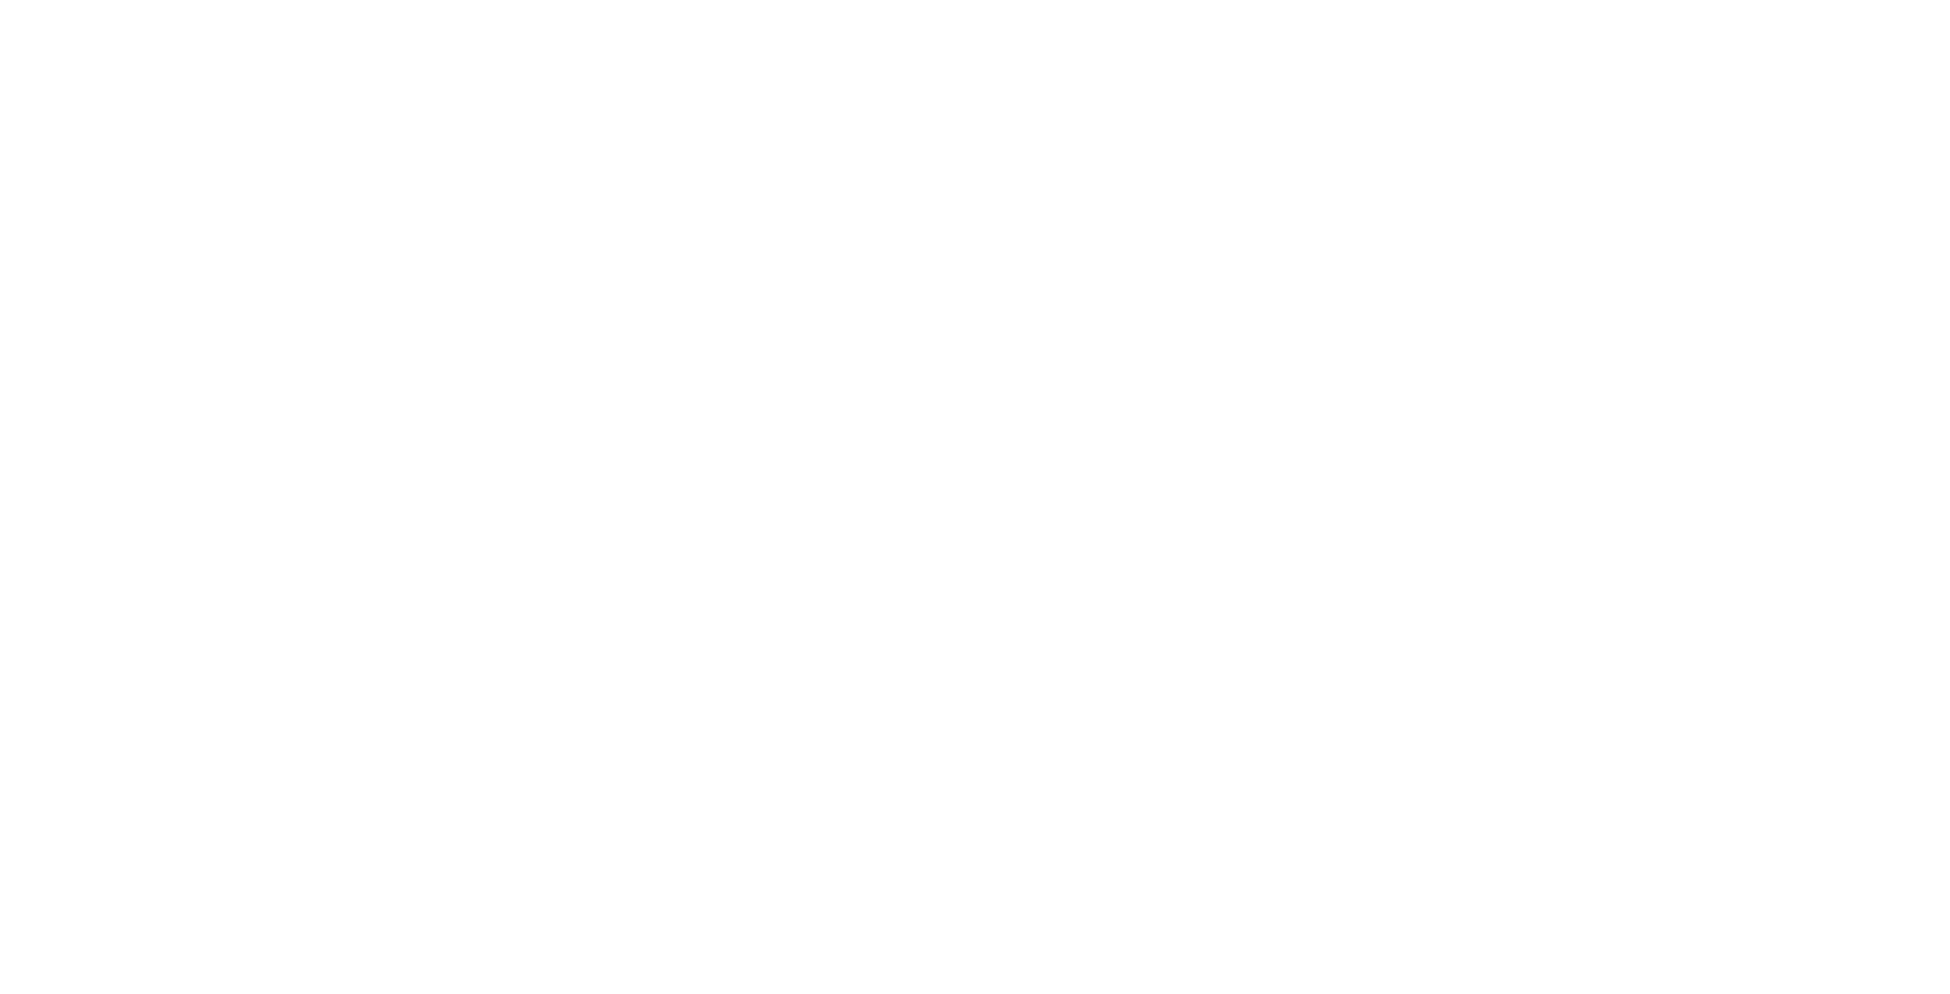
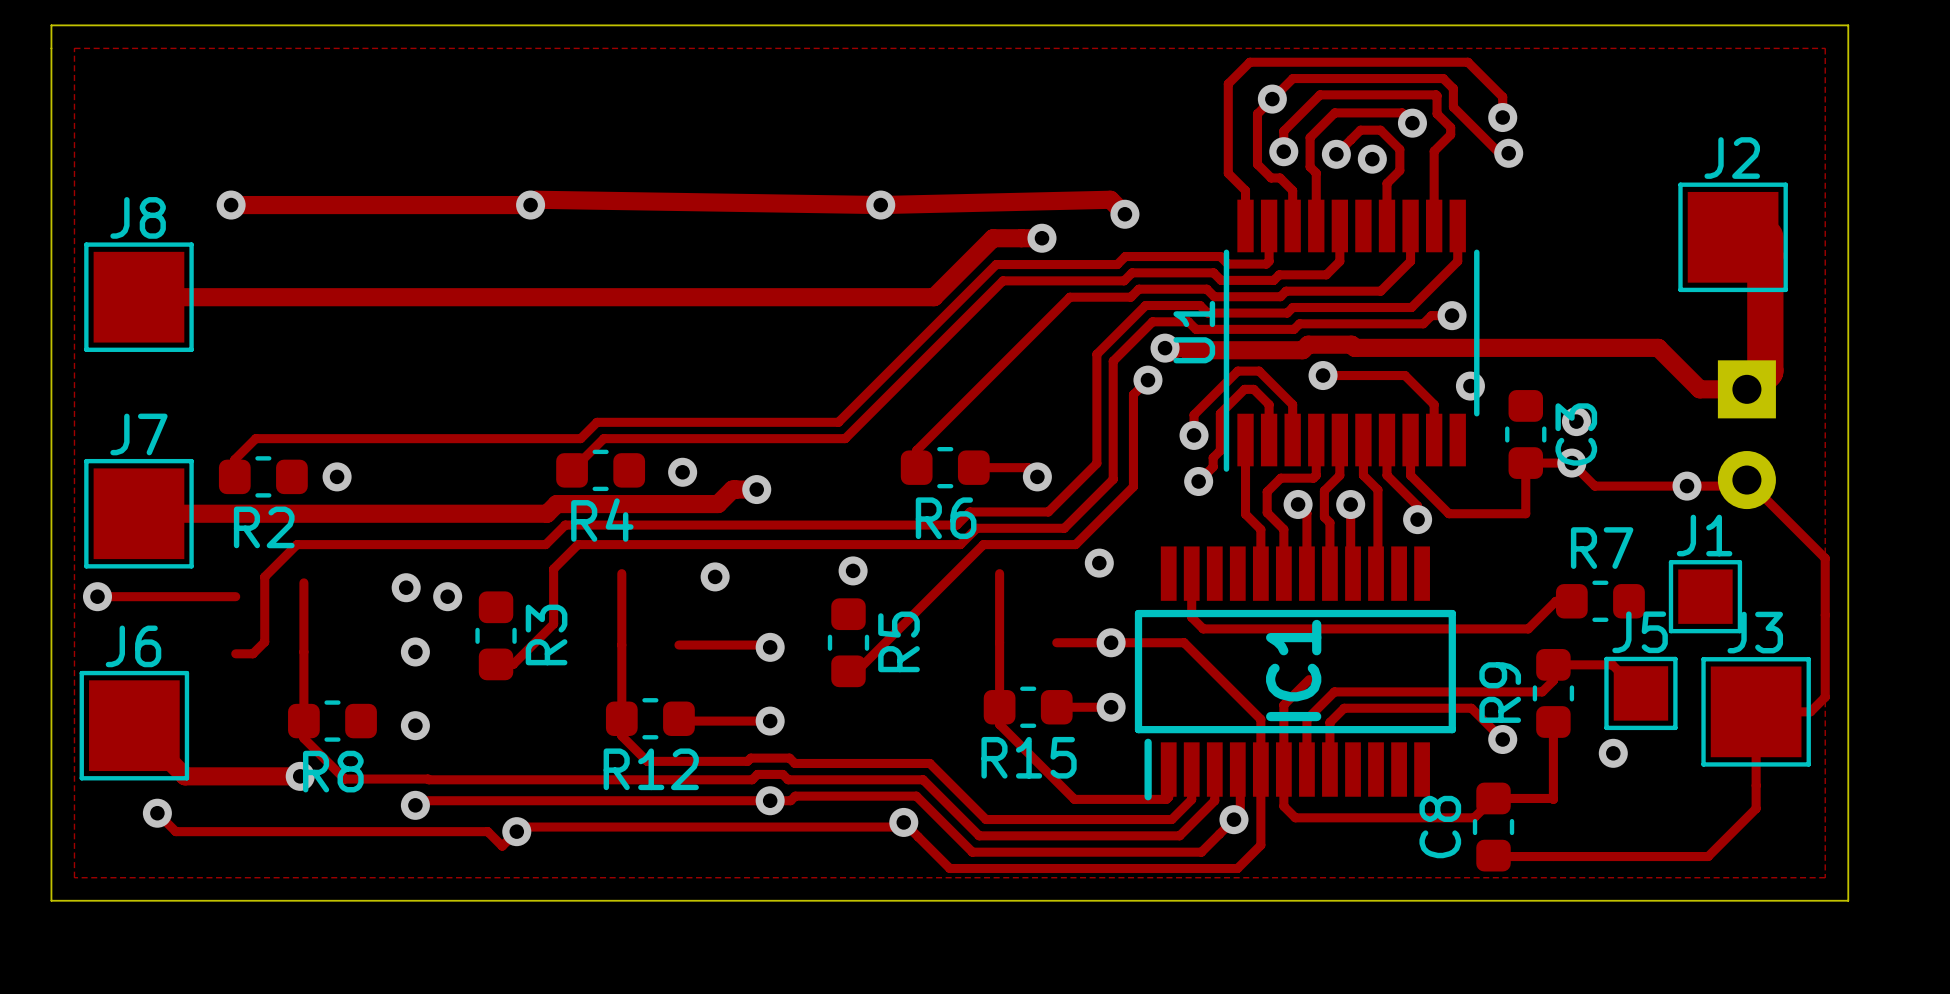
board edge: none -> (51, 25) (1848, 25) (1848, 900) (51, 900) (51, 25)
zone outline: none -> (74, 48) (74, 877) (1825, 877) (1825, 48) (74, 48)
via: none -> (1272, 99)
track: none -> (1502, 117) (1502, 96) (1467, 62) (1249, 62) (1228, 83) (1228, 173) (1245, 190) (1245, 225)
via: none -> (1502, 117)
track: none -> (1412, 123) (1402, 112) (1334, 112) (1310, 137) (1310, 166) (1316, 173) (1316, 225)
via: none -> (1412, 123)
track: none -> (1283, 151) (1283, 131) (1320, 94) (1436, 94) (1437, 113) (1450, 127) (1450, 134) (1434, 151) (1434, 225)
via: none -> (1283, 151)
track: none -> (1508, 153) (1499, 153) (1453, 107) (1453, 88) (1443, 78) (1292, 78) (1257, 113) (1257, 164) (1271, 177) (1280, 177) (1292, 190) (1292, 225)
via: none -> (1508, 153)
track: none -> (1336, 154) (1360, 130) (1380, 130) (1399, 149) (1399, 170) (1387, 183) (1387, 225)
via: none -> (1336, 154)
via: none -> (1372, 159)
track: none -> (231, 205) (530, 205) (535, 199) (880, 205) (1110, 199) (1124, 214)
via: none -> (231, 205)
via: none -> (530, 205)
via: none -> (880, 205)
via: none -> (1124, 214)
track: none -> (1269, 225) (1269, 261) (1266, 264) (1227, 264) (1220, 256) (1125, 256) (1117, 264) (996, 264) (838, 422) (597, 422) (580, 438) (255, 438) (234, 459) (234, 476)
track: none -> (1339, 225) (1339, 261) (1326, 274) (1279, 274) (1273, 280) (1221, 280) (1213, 272) (1132, 272) (1124, 280) (1002, 280) (845, 438) (603, 438) (572, 470)
track: none -> (1410, 225) (1410, 261) (1380, 291) (1286, 291) (1280, 296) (1214, 296) (1206, 289) (1138, 289) (1130, 297) (1069, 297) (916, 450) (916, 467)
track: none -> (1457, 225) (1457, 261) (1411, 307) (1292, 307) (1287, 313) (1207, 313) (1200, 305) (1145, 305) (1096, 354) (1096, 463) (1048, 511) (969, 511) (956, 525) (565, 525) (545, 544) (297, 544) (264, 576) (264, 642) (252, 653) (235, 653)
J2: none -> (1733, 237)
track: none -> (1765, 237) (1765, 370) (1746, 389) (1699, 389) (1658, 347) (1354, 347) (1351, 344) (1308, 344) (1302, 350) (1187, 350) (1185, 348) (1165, 348) (1171, 352)
track: none -> (1042, 238) (993, 238) (934, 297) (138, 297)
via: none -> (1042, 238)
J8: none -> (138, 297)
track: none -> (1452, 315) (1431, 315) (1423, 323) (1299, 323) (1294, 329) (1196, 329) (1188, 321) (1152, 321) (1113, 361) (1113, 479) (1064, 528) (976, 528) (960, 544) (578, 544) (553, 569) (553, 624) (513, 664) (496, 664)
via: none -> (1452, 315)
U1: none -> (1351, 335)
via: none -> (1165, 348)
track: none -> (1323, 375) (1405, 375) (1434, 404) (1434, 440)
via: none -> (1323, 375)
track: none -> (1147, 380) (1133, 394) (1133, 486) (1075, 544) (983, 544) (856, 671) (848, 671)
via: none -> (1147, 380)
via: none -> (1470, 386)
via: none -> (1576, 421)
C3: none -> (1525, 434)
part: none -> (1746, 434)
track: none -> (1194, 435) (1194, 414) (1237, 371) (1259, 371) (1292, 404) (1292, 440)
via: none -> (1194, 435)
track: none -> (1245, 440) (1245, 514) (1260, 529) (1260, 559)
track: none -> (1269, 440) (1269, 404) (1253, 389) (1244, 389) (1220, 413) (1220, 450) (1213, 457) (1213, 466) (1198, 481)
track: none -> (1316, 440) (1316, 475) (1313, 478) (1280, 478) (1267, 491) (1267, 512) (1283, 529) (1283, 559)
track: none -> (1339, 440) (1339, 475) (1324, 490) (1324, 517) (1329, 522) (1329, 559)
track: none -> (1363, 440) (1363, 475) (1377, 489) (1377, 557) (1376, 559)
track: none -> (1387, 440) (1387, 475) (1417, 505) (1417, 519)
track: none -> (1410, 440) (1410, 475) (1448, 513) (1525, 513) (1525, 463) (1571, 463) (1594, 486) (1740, 486) (1746, 480) (1825, 558) (1825, 697) (1810, 711) (1756, 711) (1756, 808) (1708, 856) (1493, 855)
via: none -> (1571, 463)
R6: none -> (945, 467)
track: none -> (973, 467) (1028, 467) (1037, 476)
R4: none -> (600, 470)
via: none -> (682, 472)
R2: none -> (263, 476)
via: none -> (337, 476)
via: none -> (1037, 476)
via: none -> (1198, 481)
via: none -> (1687, 486)
track: none -> (756, 489) (732, 489) (718, 504) (556, 504) (547, 513) (138, 513)
via: none -> (756, 489)
track: none -> (1298, 504) (1306, 513) (1306, 559)
via: none -> (1298, 504)
track: none -> (1350, 504) (1350, 557) (1353, 559)
via: none -> (1350, 504)
J7: none -> (138, 513)
via: none -> (1417, 519)
track: none -> (1191, 559) (1191, 617) (1203, 628) (1528, 628) (1555, 601) (1571, 601)
via: none -> (1099, 563)
via: none -> (853, 570)
track: none -> (621, 573) (621, 736) (647, 761) (747, 761) (750, 758) (789, 758) (794, 763) (929, 763) (985, 819) (1171, 819) (1191, 799) (1191, 755)
track: none -> (999, 573) (999, 724) (1074, 799) (1166, 799) (1168, 797) (1168, 755)
via: none -> (715, 576)
track: none -> (303, 582) (303, 738) (344, 779) (752, 779) (757, 774) (782, 774) (788, 779) (923, 779) (979, 835) (1179, 835) (1214, 800) (1214, 755)
via: none -> (406, 587)
track: none -> (97, 596) (235, 596)
via: none -> (97, 596)
via: none -> (447, 596)
J1: none -> (1705, 596)
R7: none -> (1600, 601)
R3: none -> (496, 635)
R5: none -> (848, 642)
track: none -> (1056, 642) (1184, 642) (1260, 719) (1260, 845) (1237, 868) (949, 868) (903, 822) (899, 827) (521, 827) (502, 846) (487, 831) (175, 831) (157, 813)
via: none -> (1111, 642)
track: none -> (678, 645) (767, 645) (770, 647)
via: none -> (770, 647)
via: none -> (415, 651)
IC1: none -> (1295, 673)
track: none -> (1309, 679) (1283, 704) (1283, 806) (1295, 817) (1474, 817) (1493, 798) (1553, 799) (1553, 721)
R9: none -> (1553, 693)
track: none -> (1640, 693) (1612, 664) (1553, 664) (1553, 680) (1542, 691) (1334, 691) (1306, 719) (1306, 755)
J5: none -> (1640, 693)
R15: none -> (1028, 707)
track: none -> (1056, 707) (1111, 707)
via: none -> (1111, 707)
J3: none -> (1756, 711)
R12: none -> (650, 718)
track: none -> (678, 718) (681, 721) (770, 721)
R8: none -> (332, 721)
via: none -> (770, 721)
track: none -> (134, 725) (185, 776) (300, 776)
J6: none -> (134, 725)
via: none -> (415, 725)
track: none -> (1502, 739) (1471, 708) (1344, 708) (1329, 722) (1329, 755)
via: none -> (1502, 739)
via: none -> (1613, 753)
track: none -> (1237, 755) (1240, 758) (1240, 813) (1201, 852) (972, 852) (916, 796) (795, 796) (790, 800) (420, 800) (415, 805)
via: none -> (300, 776)
via: none -> (770, 800)
via: none -> (415, 805)
via: none -> (157, 813)
via: none -> (1233, 819)
via: none -> (903, 822)
C8: none -> (1493, 827)
via: none -> (516, 831)

